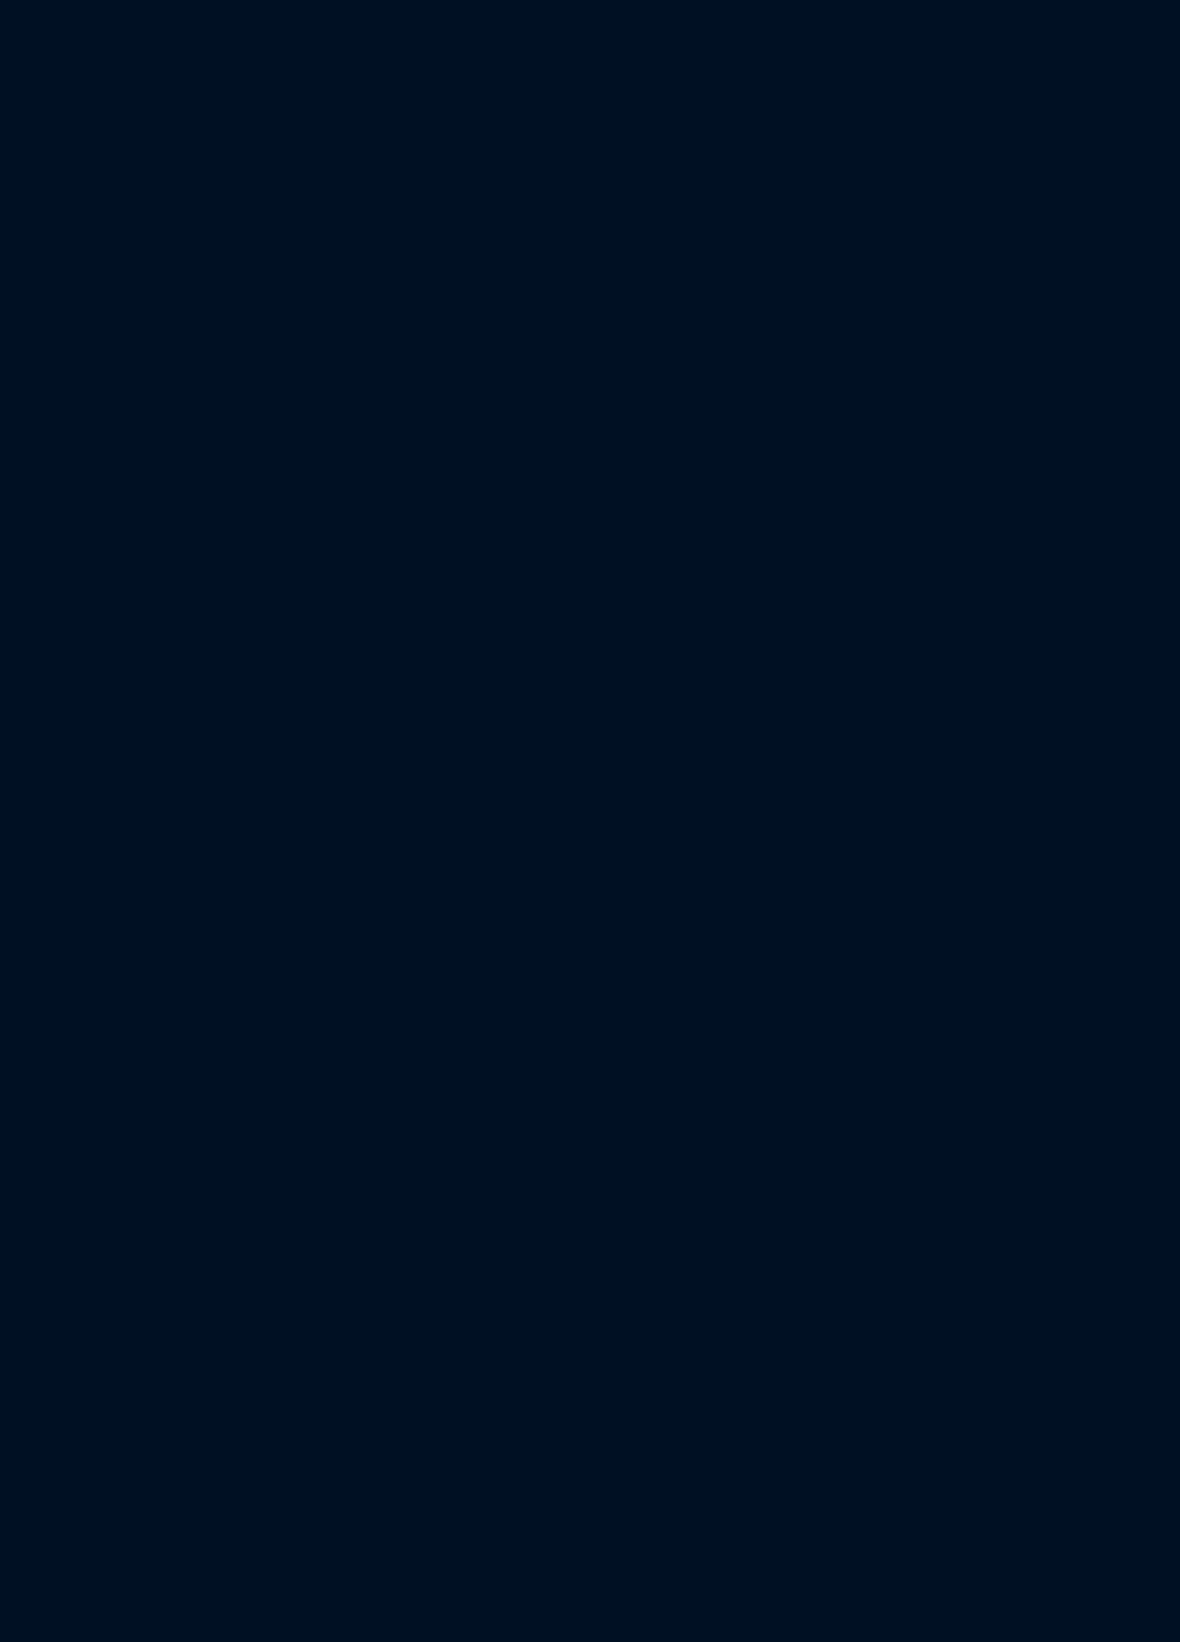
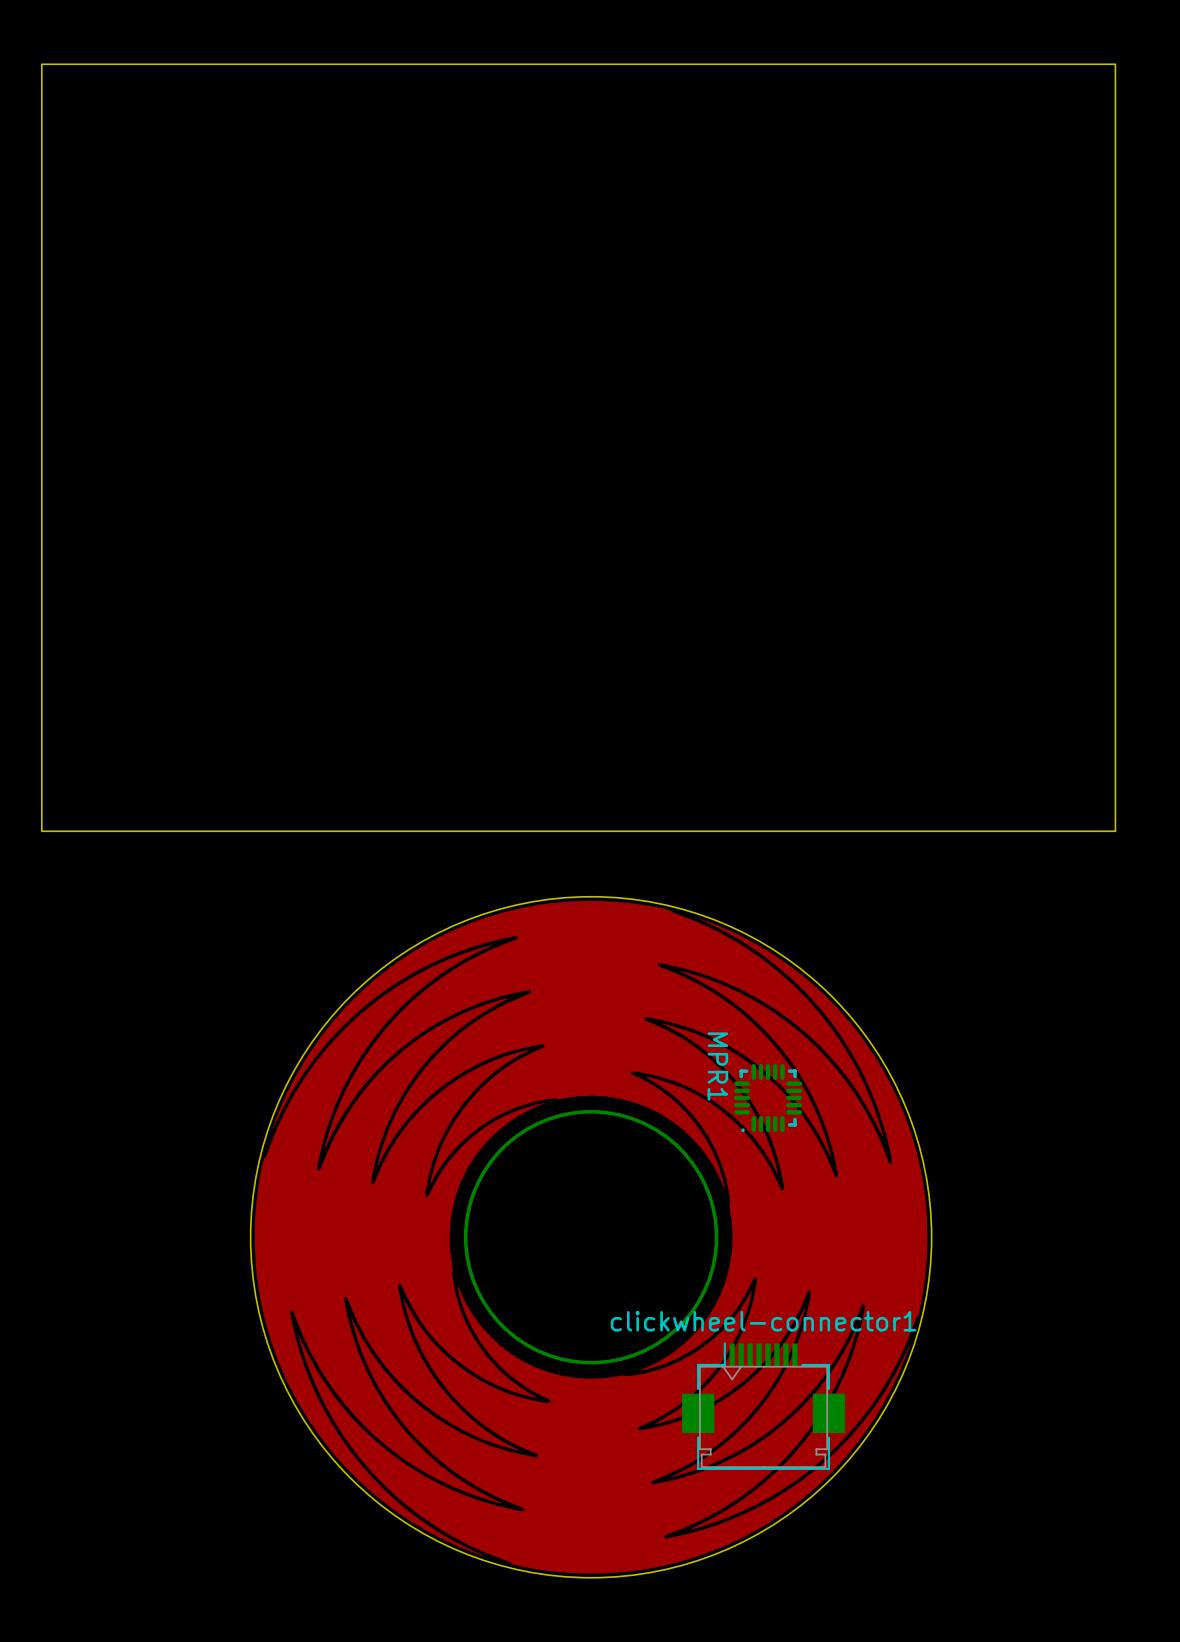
drawing: none -> [41, 63, 1116, 832]
MPR1: none -> (768, 1098)
part: none -> (591, 1237)
clickwheel-connector1: none -> (763, 1406)

